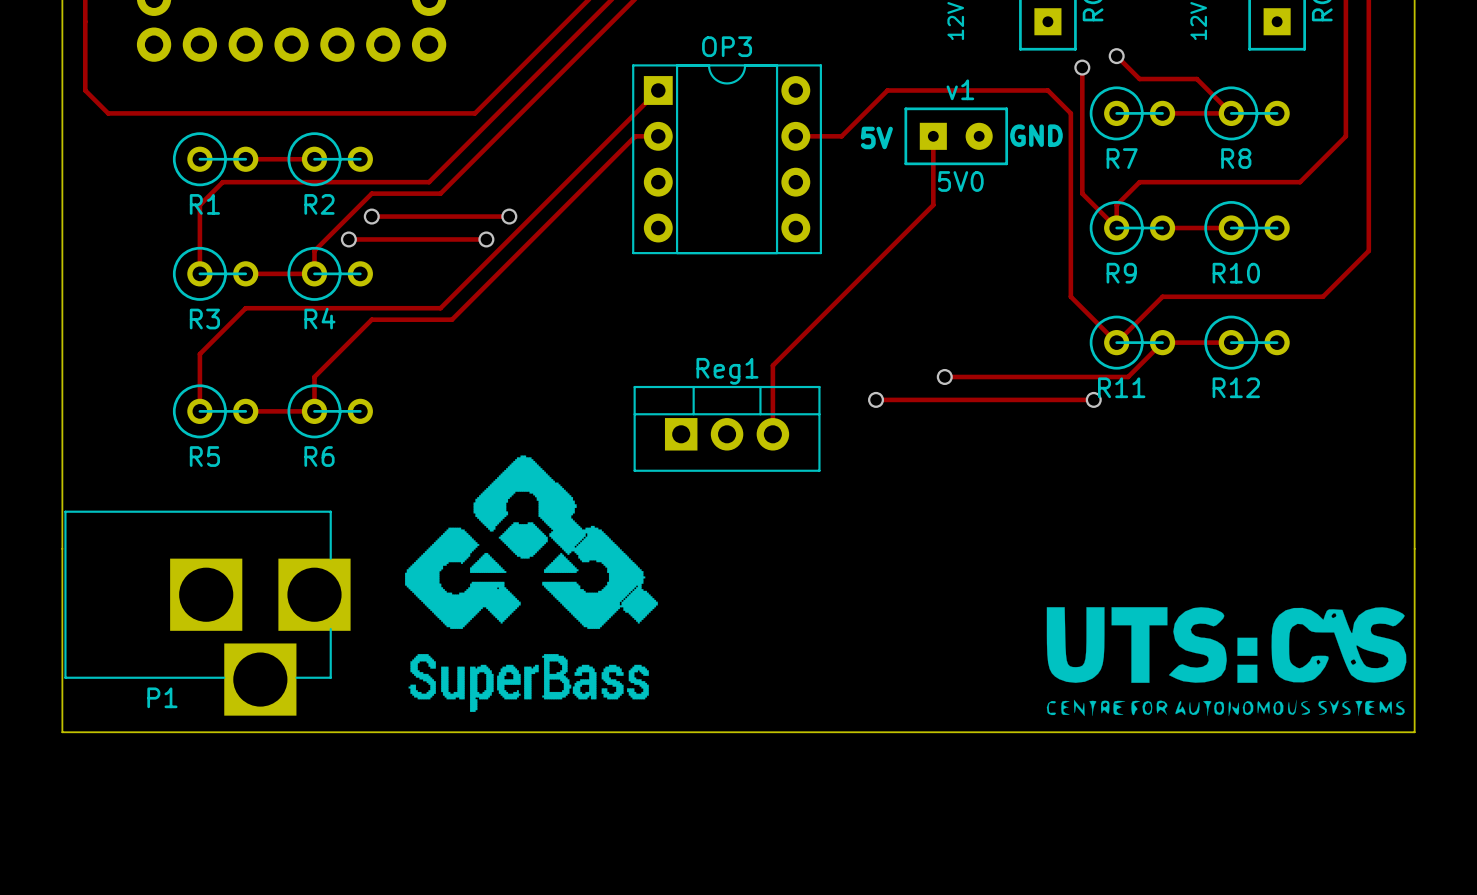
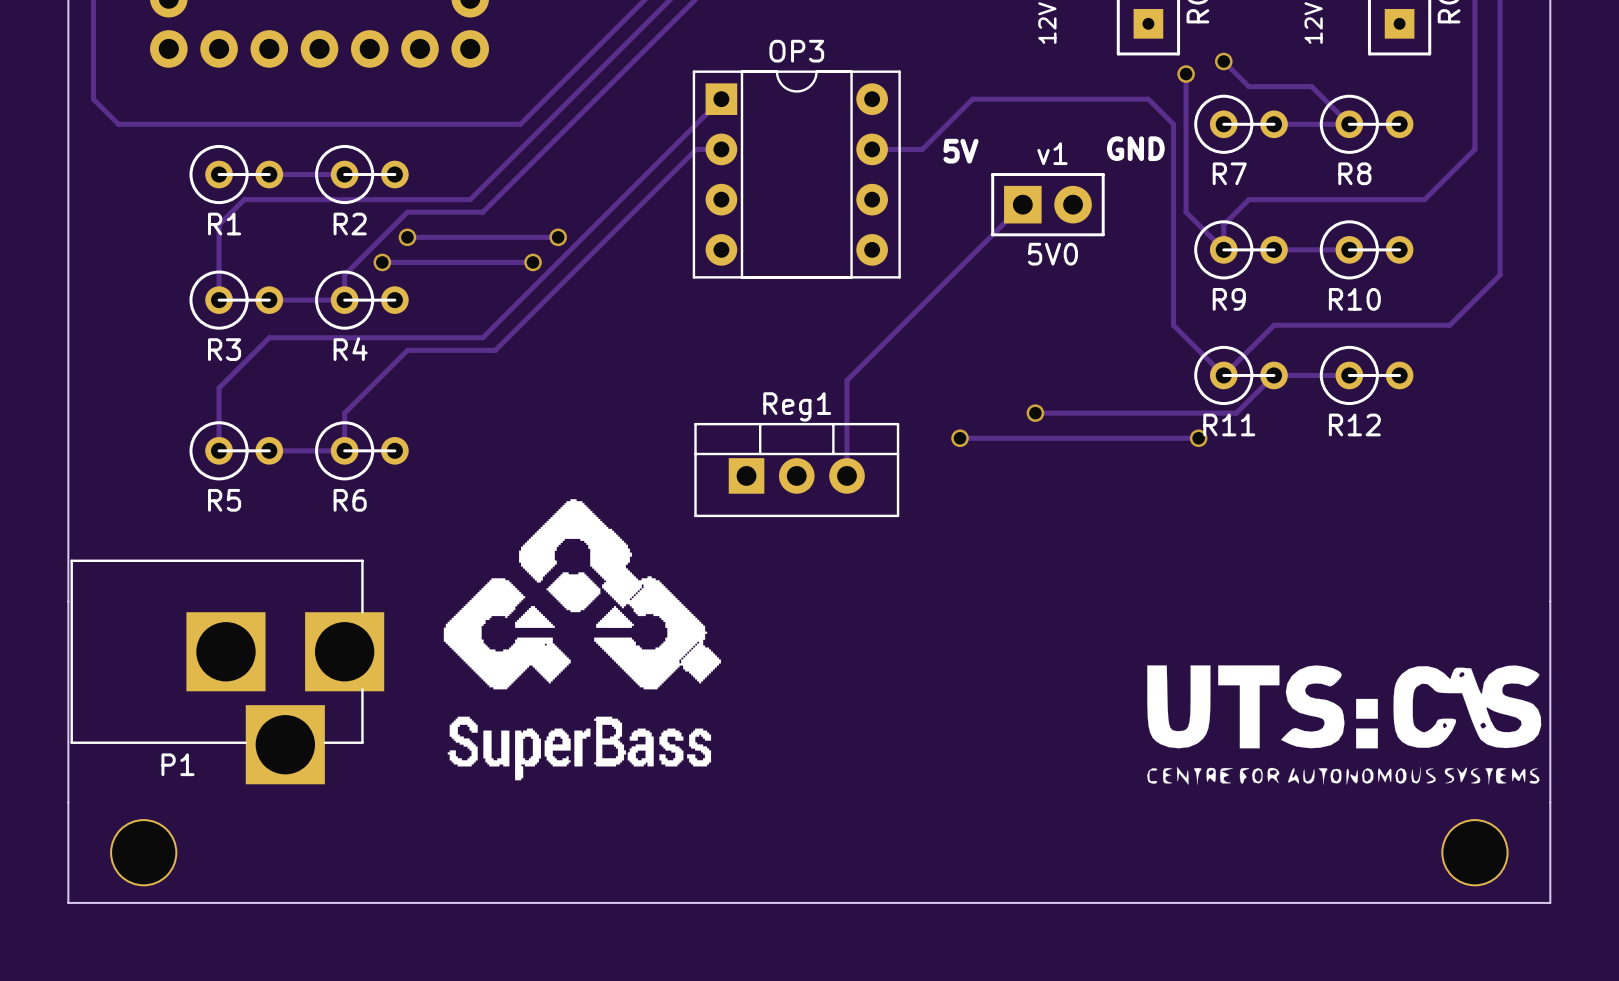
v1 footprint: [904, 107, 1009, 166] -> [991, 173, 1105, 237]
track: (933, 136) (933, 205) (772, 365) -> (1022, 204) (847, 380) (847, 400)
board edge: (62, 732) (1414, 732) -> (68, 802) (68, 902) (1550, 902) (1550, 802)
part: none -> (143, 852)
part: none -> (1474, 852)

